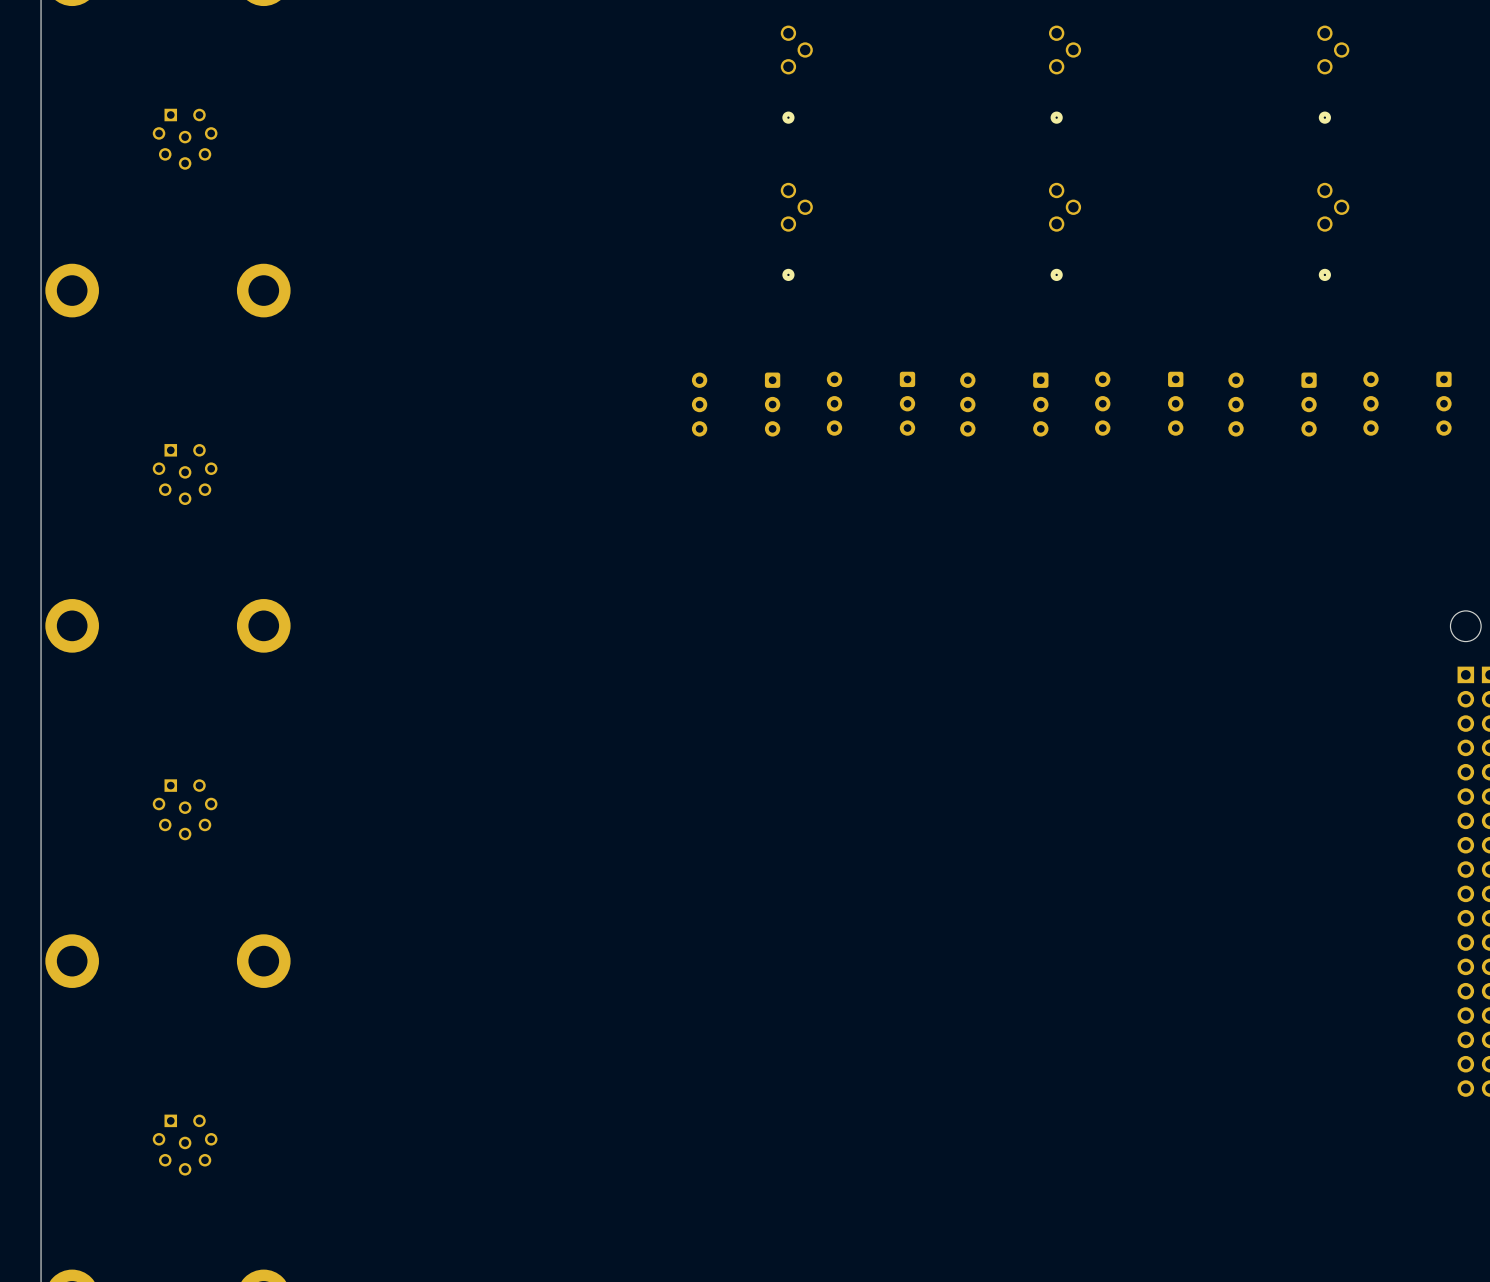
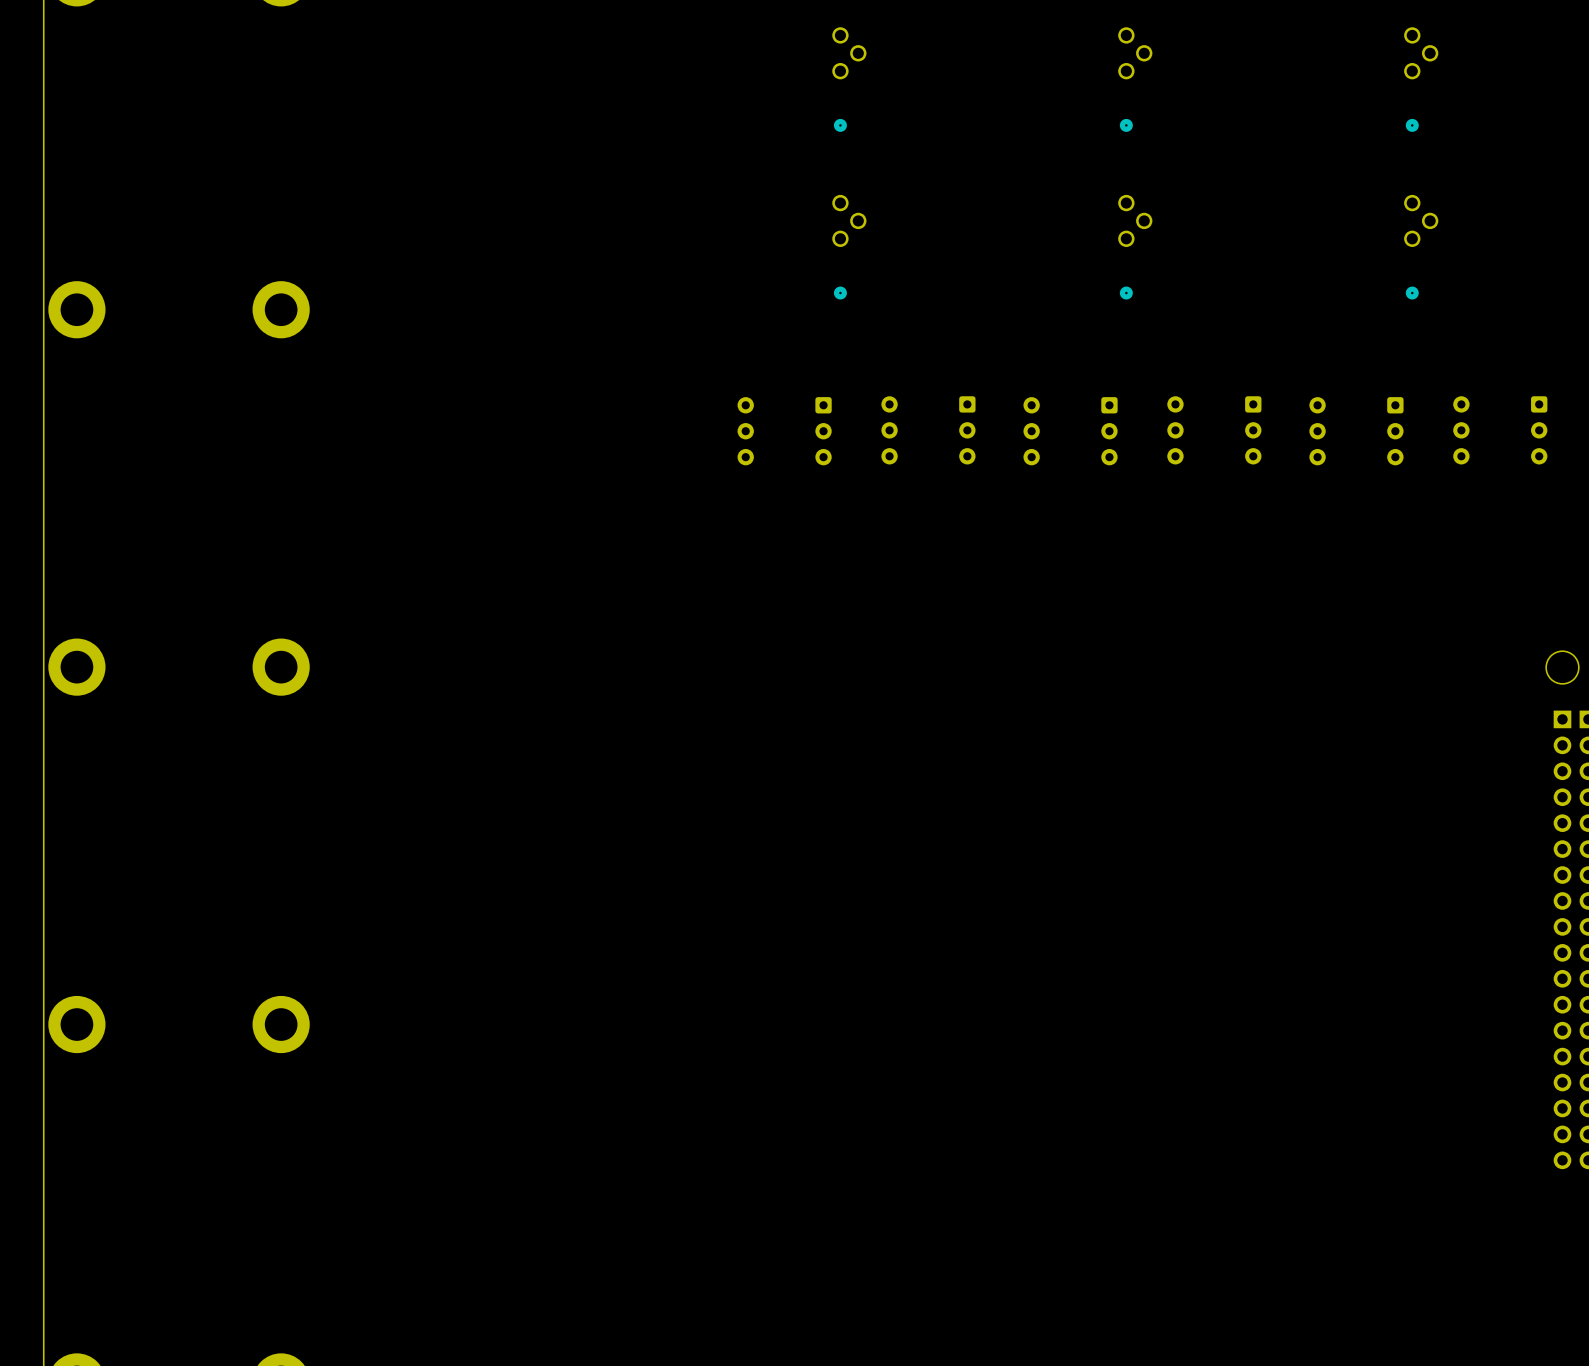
part: (185, 139) -> none
part: (185, 474) -> none
part: (185, 809) -> none
part: (185, 1145) -> none

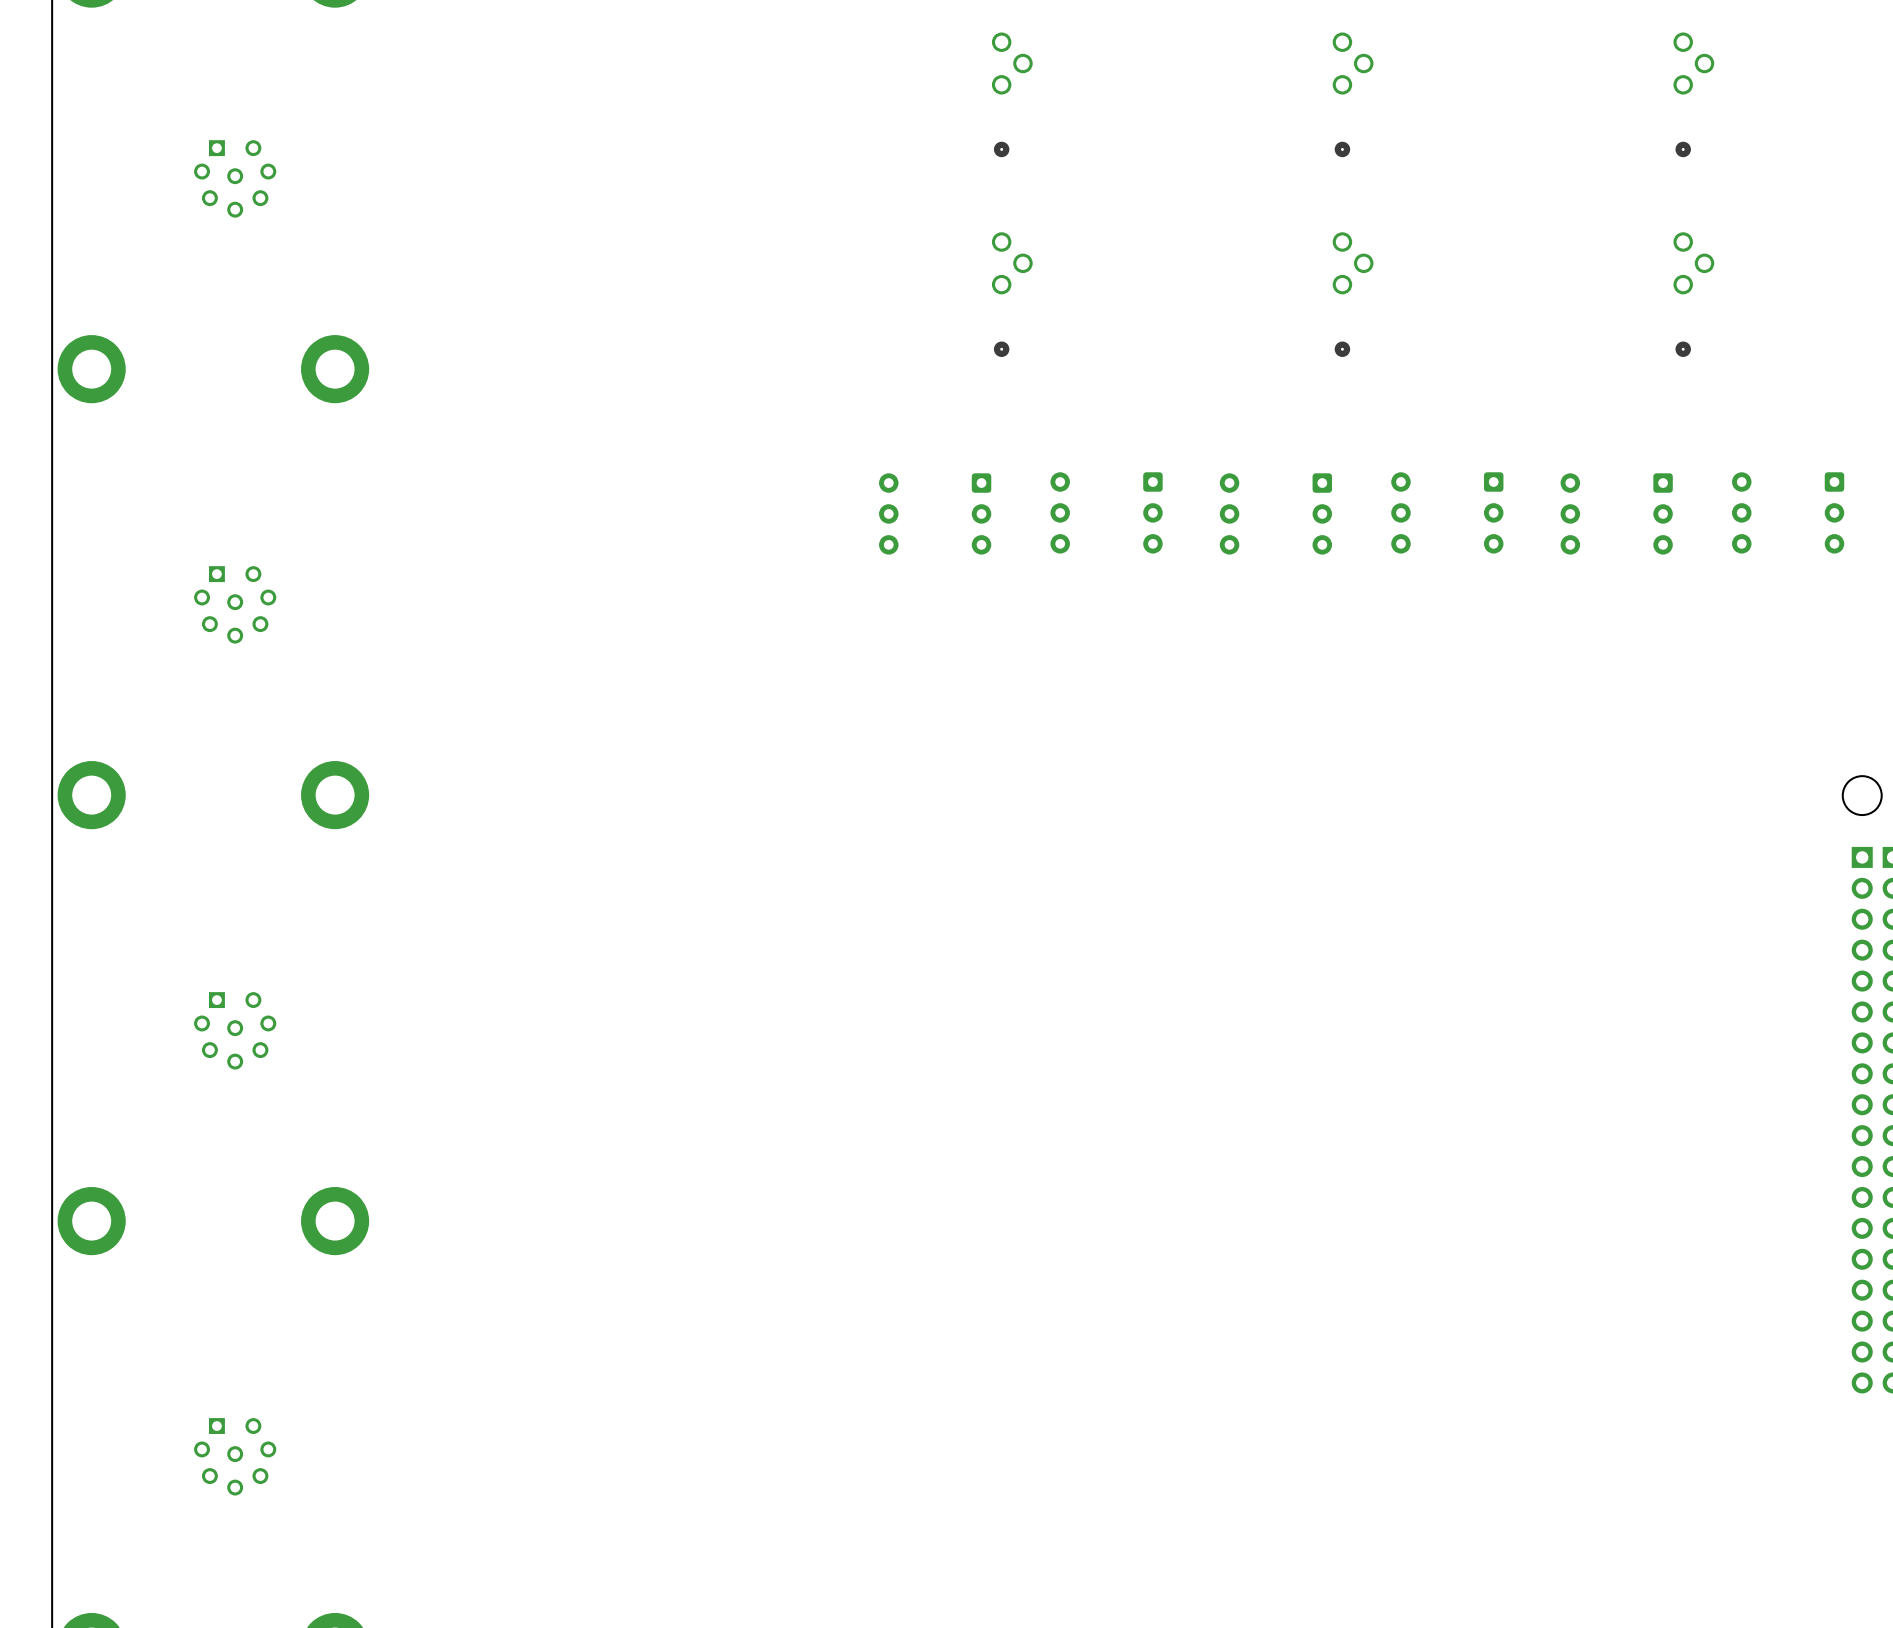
part: none -> (235, 178)
part: none -> (235, 604)
part: none -> (235, 1030)
part: none -> (235, 1456)

